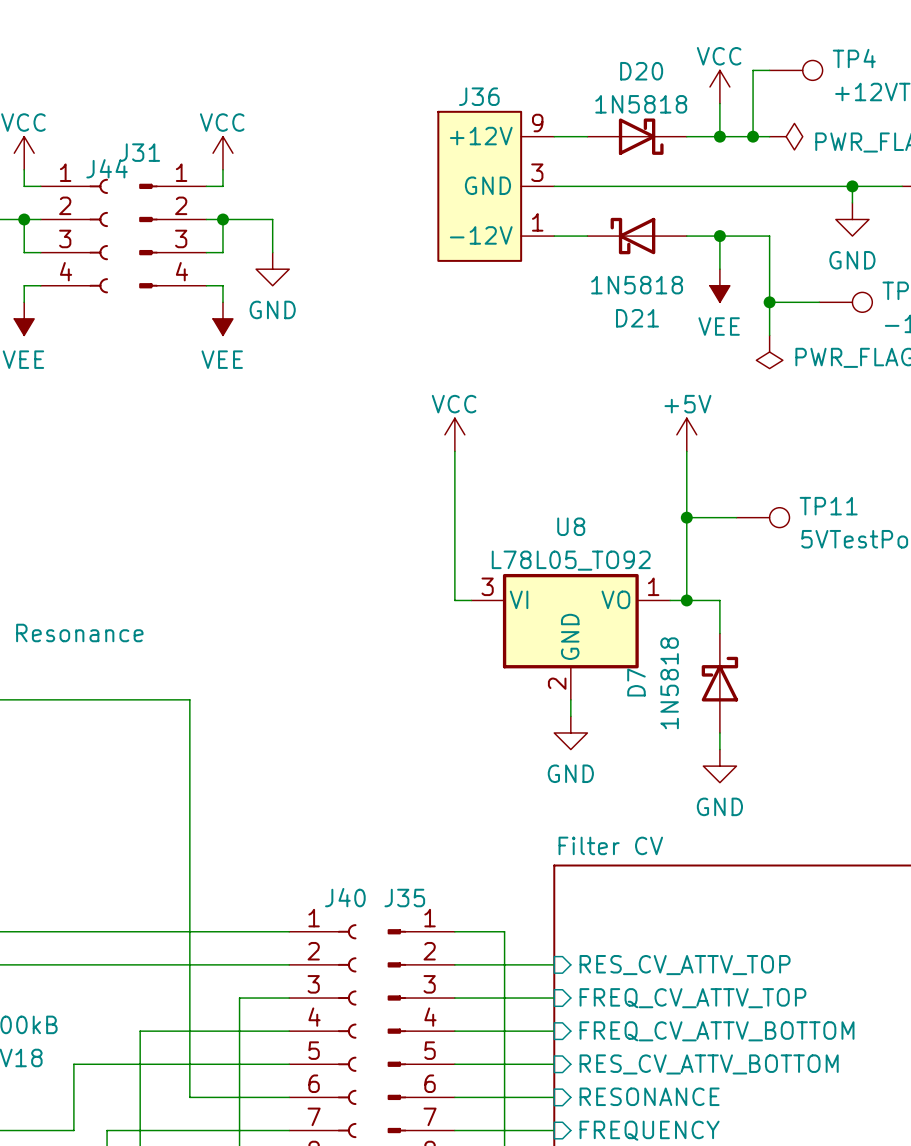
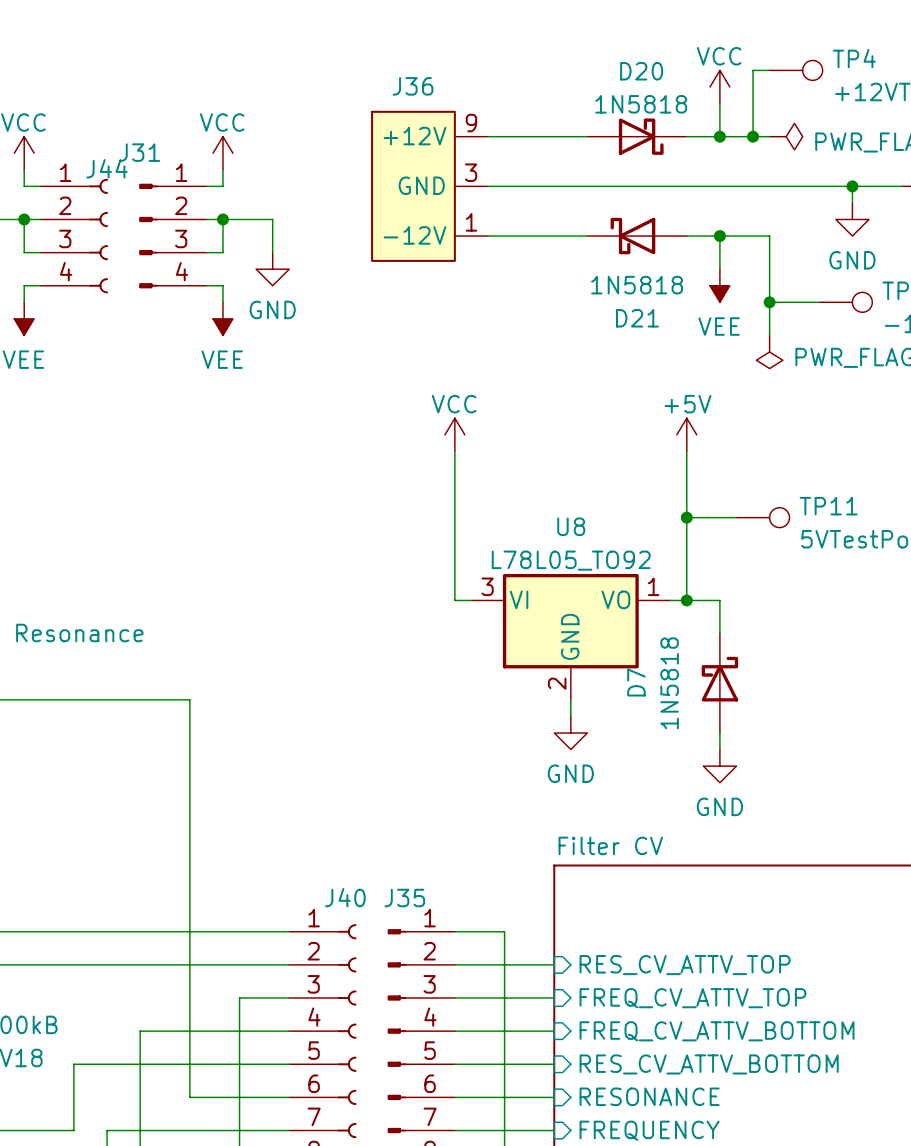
J36 name position: J36 (479, 96) -> J36 (413, 86)
J36 position: (495, 186) -> (429, 186)

